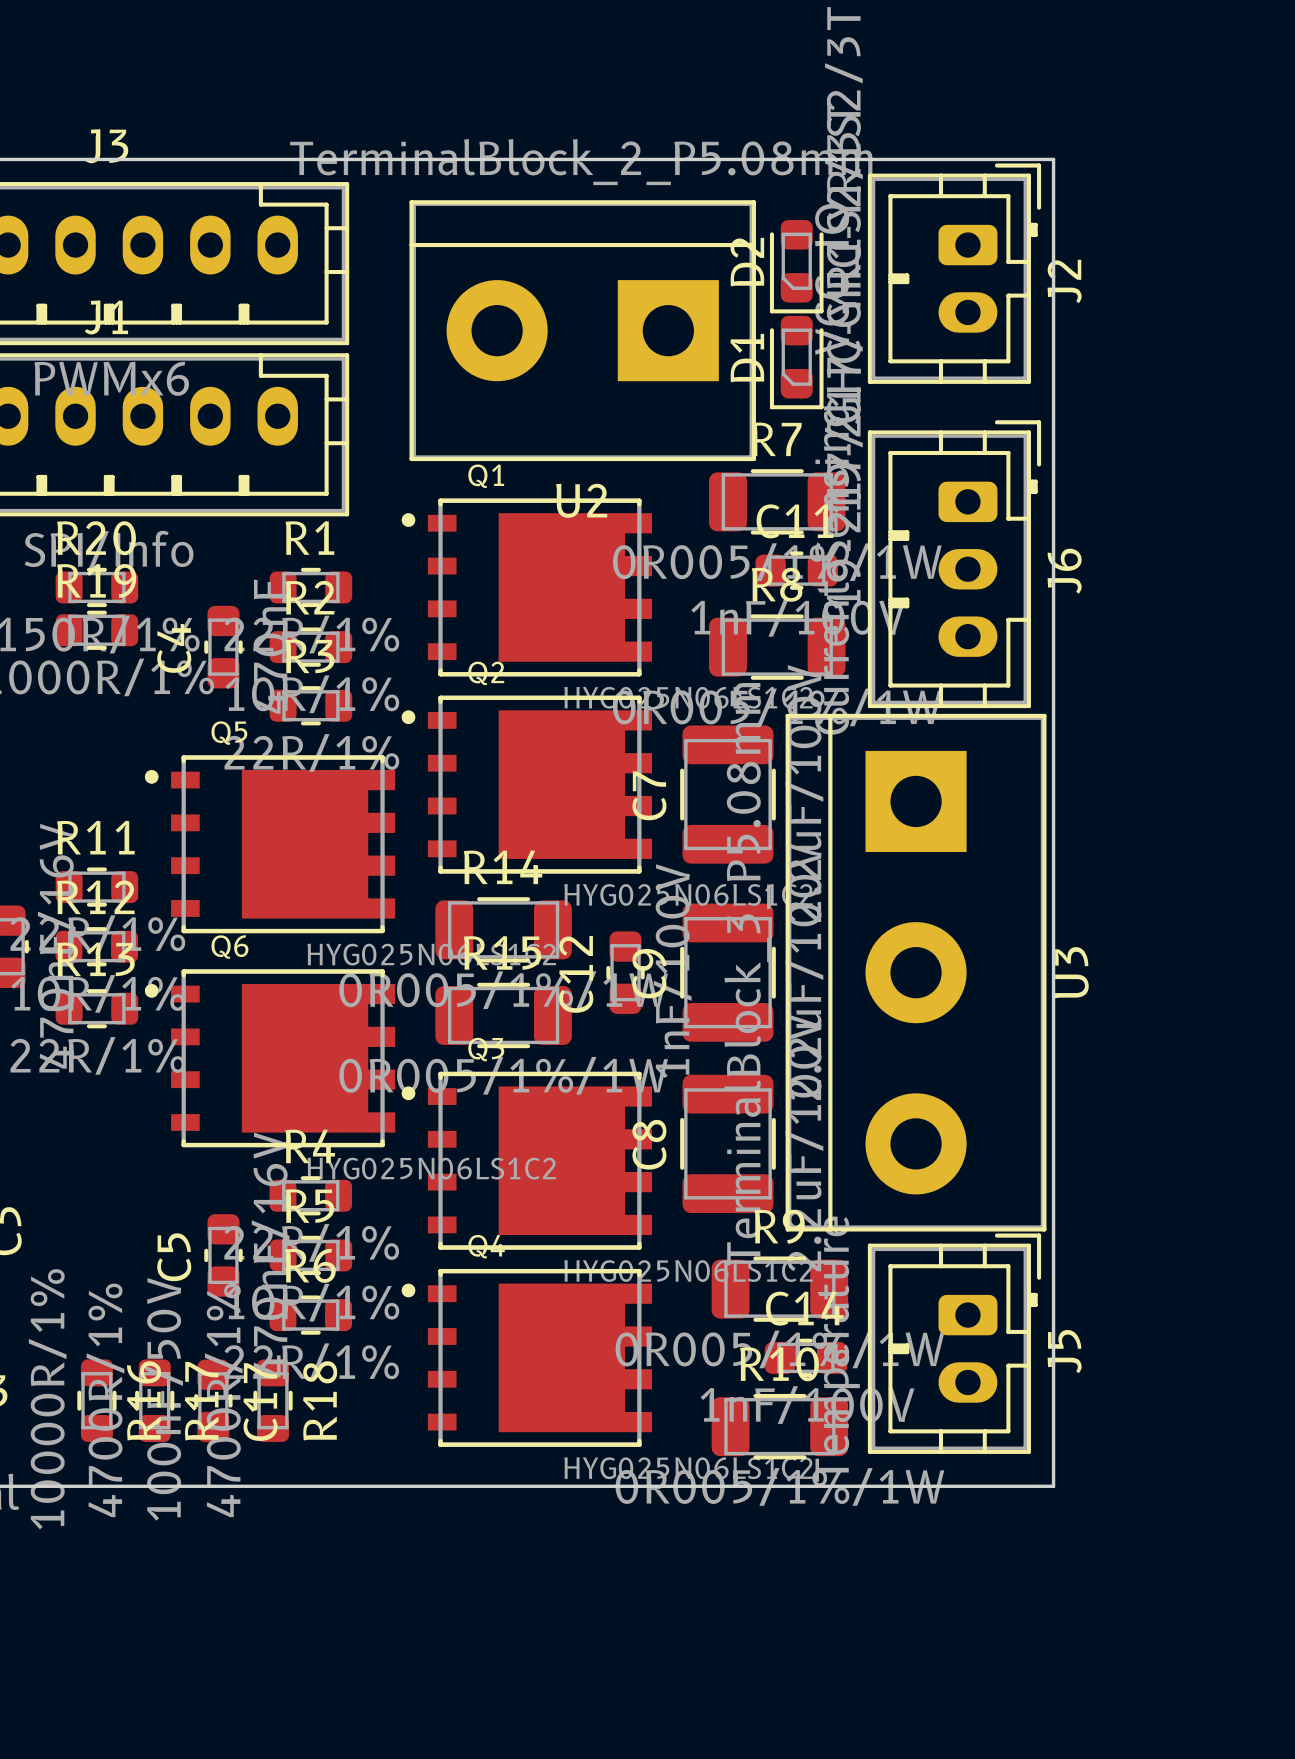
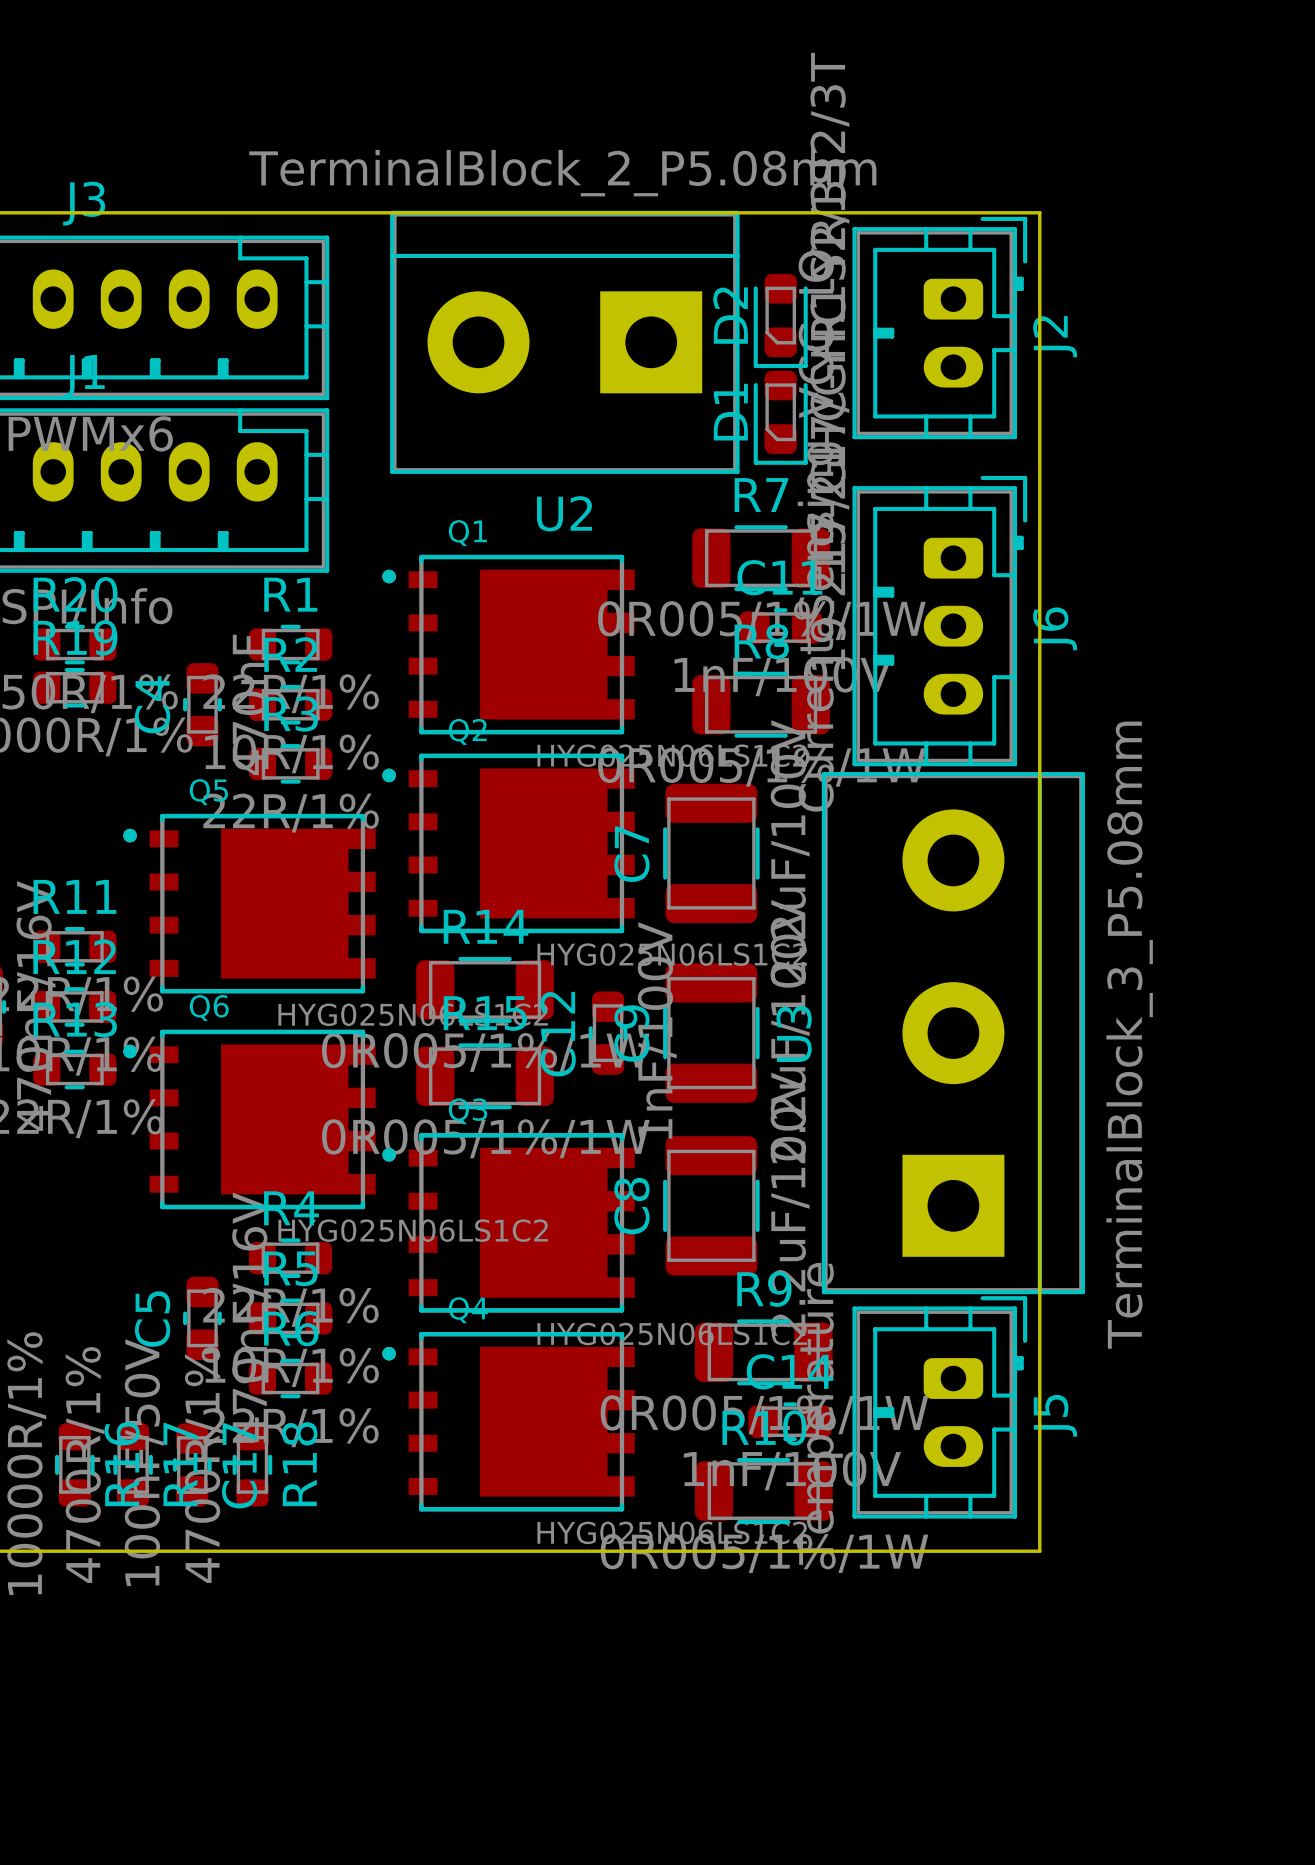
U2 position: (582, 330) -> (564, 342)
U3 rotation: 0° (916, 972) -> 180° (953, 1033)

